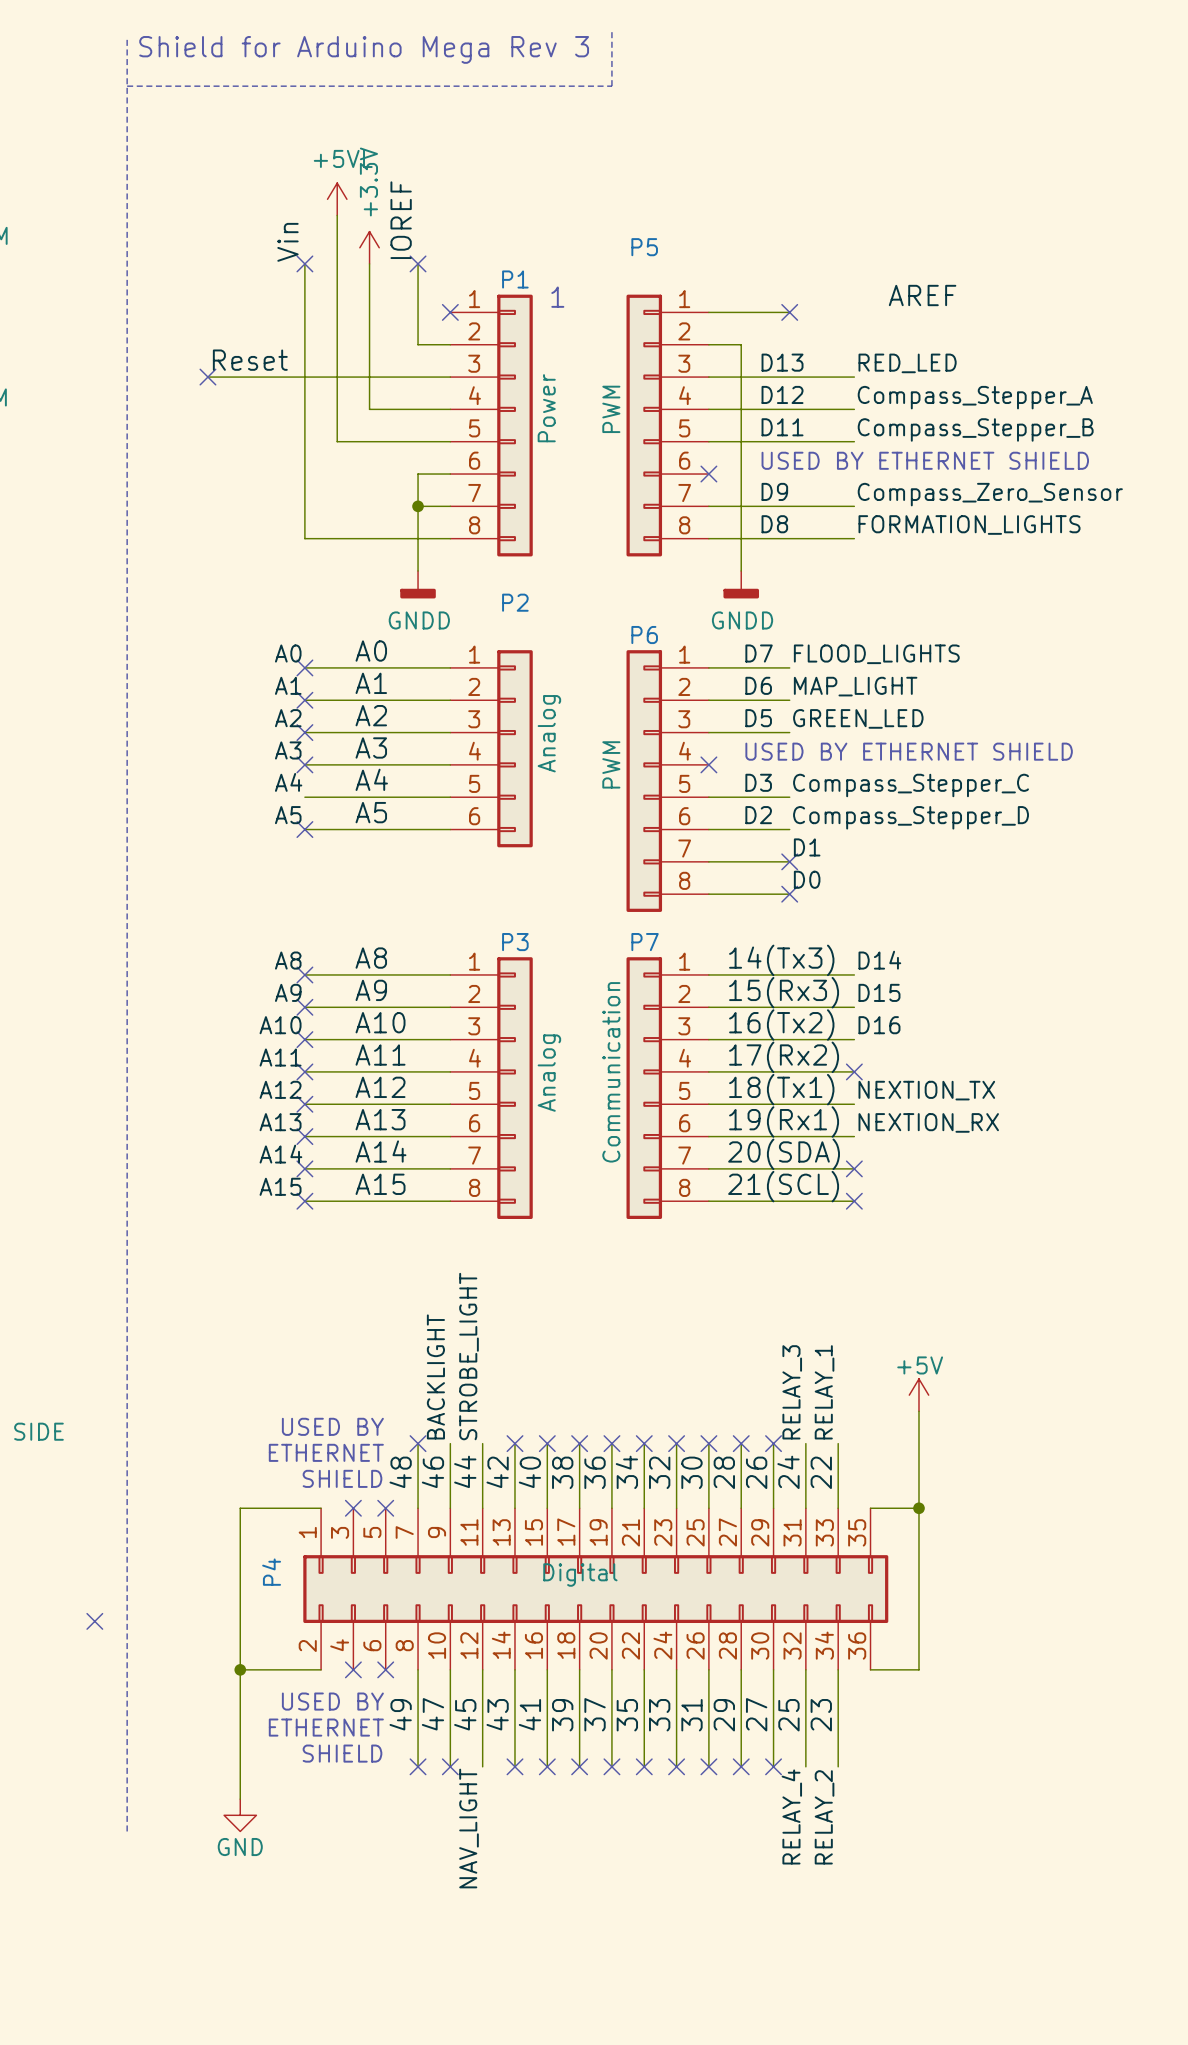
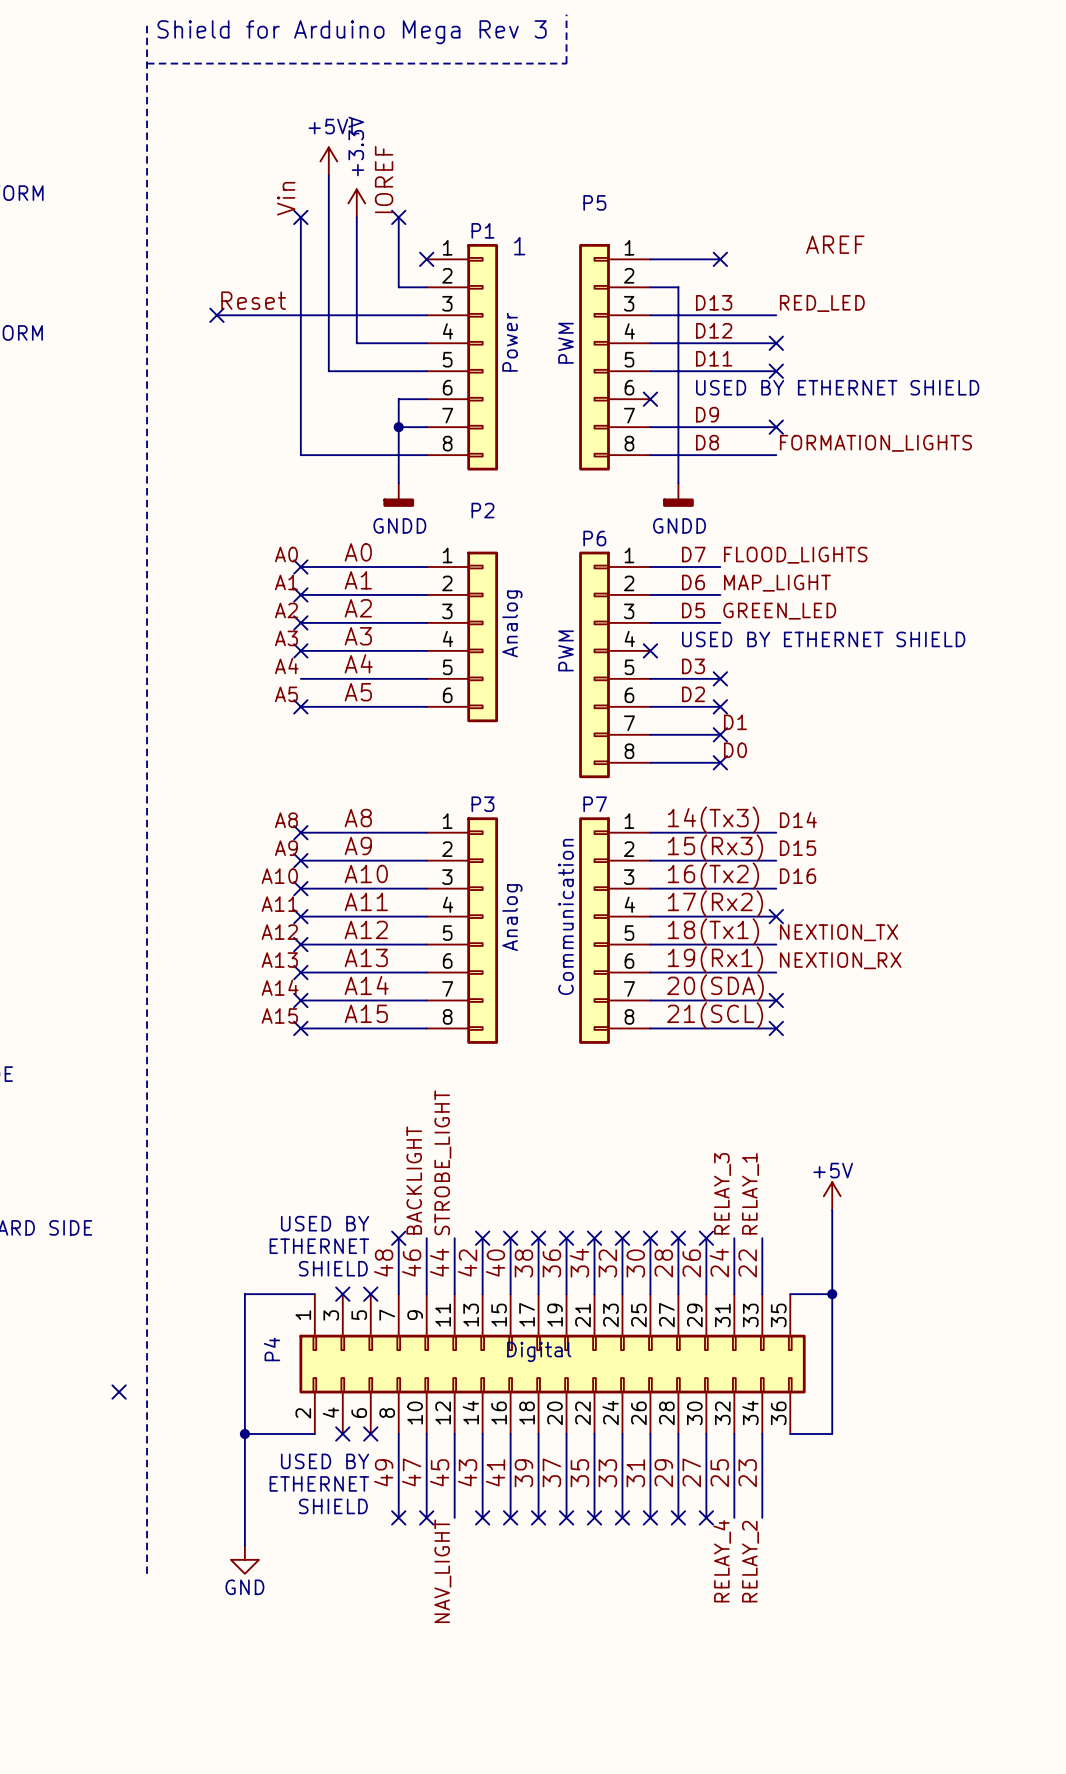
label: Compass_Stepper_A (975, 397) -> none
no-connect mark: none -> (776, 343)
label: Compass_Stepper_B (975, 429) -> none
no-connect mark: none -> (776, 371)
label: Compass_Zero_Sensor (990, 494) -> none
no-connect mark: none -> (776, 427)
label: Compass_Stepper_C (911, 785) -> none
no-connect mark: none -> (720, 678)
label: Compass_Stepper_D (911, 817) -> none
no-connect mark: none -> (720, 706)

